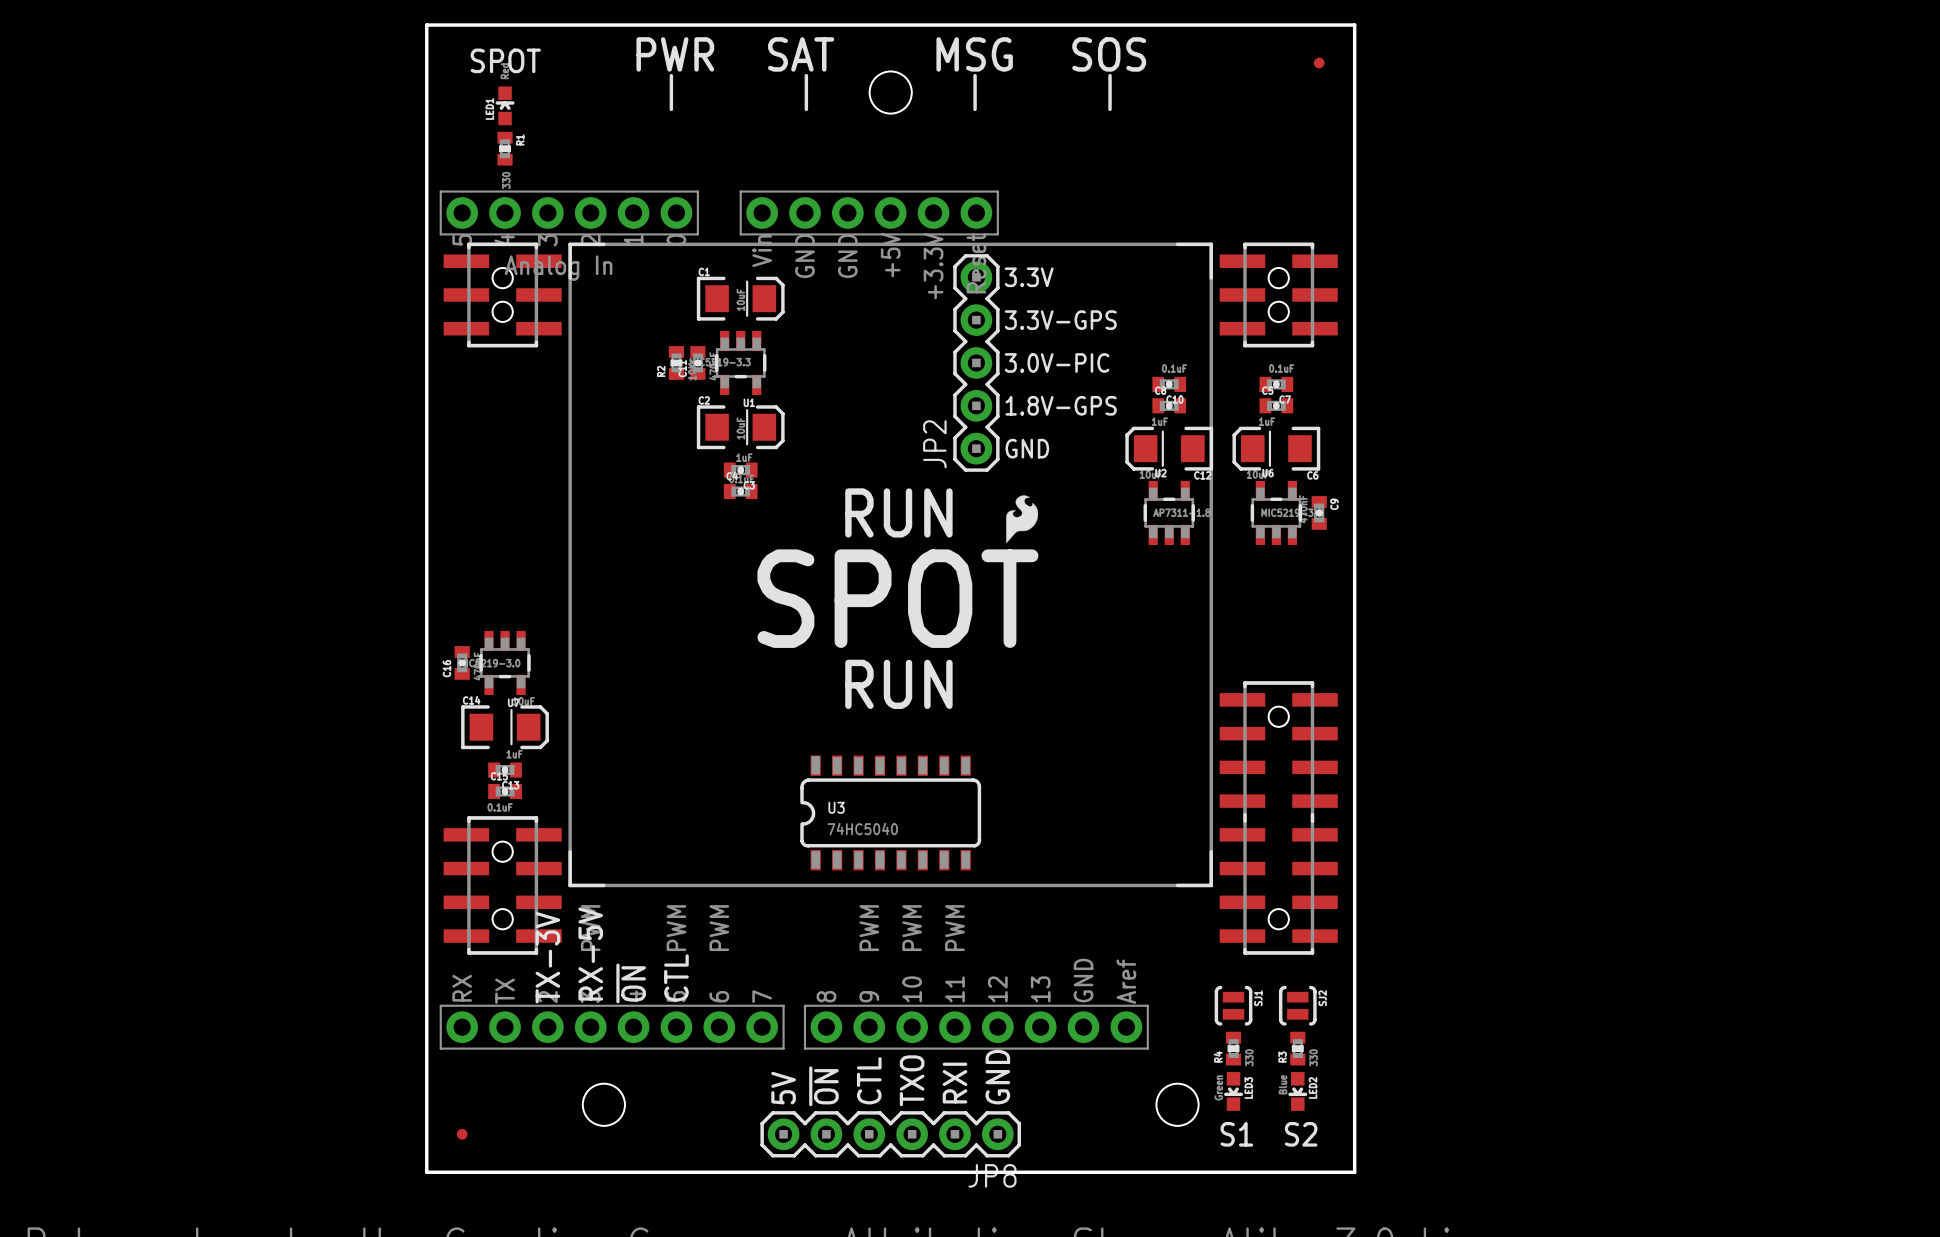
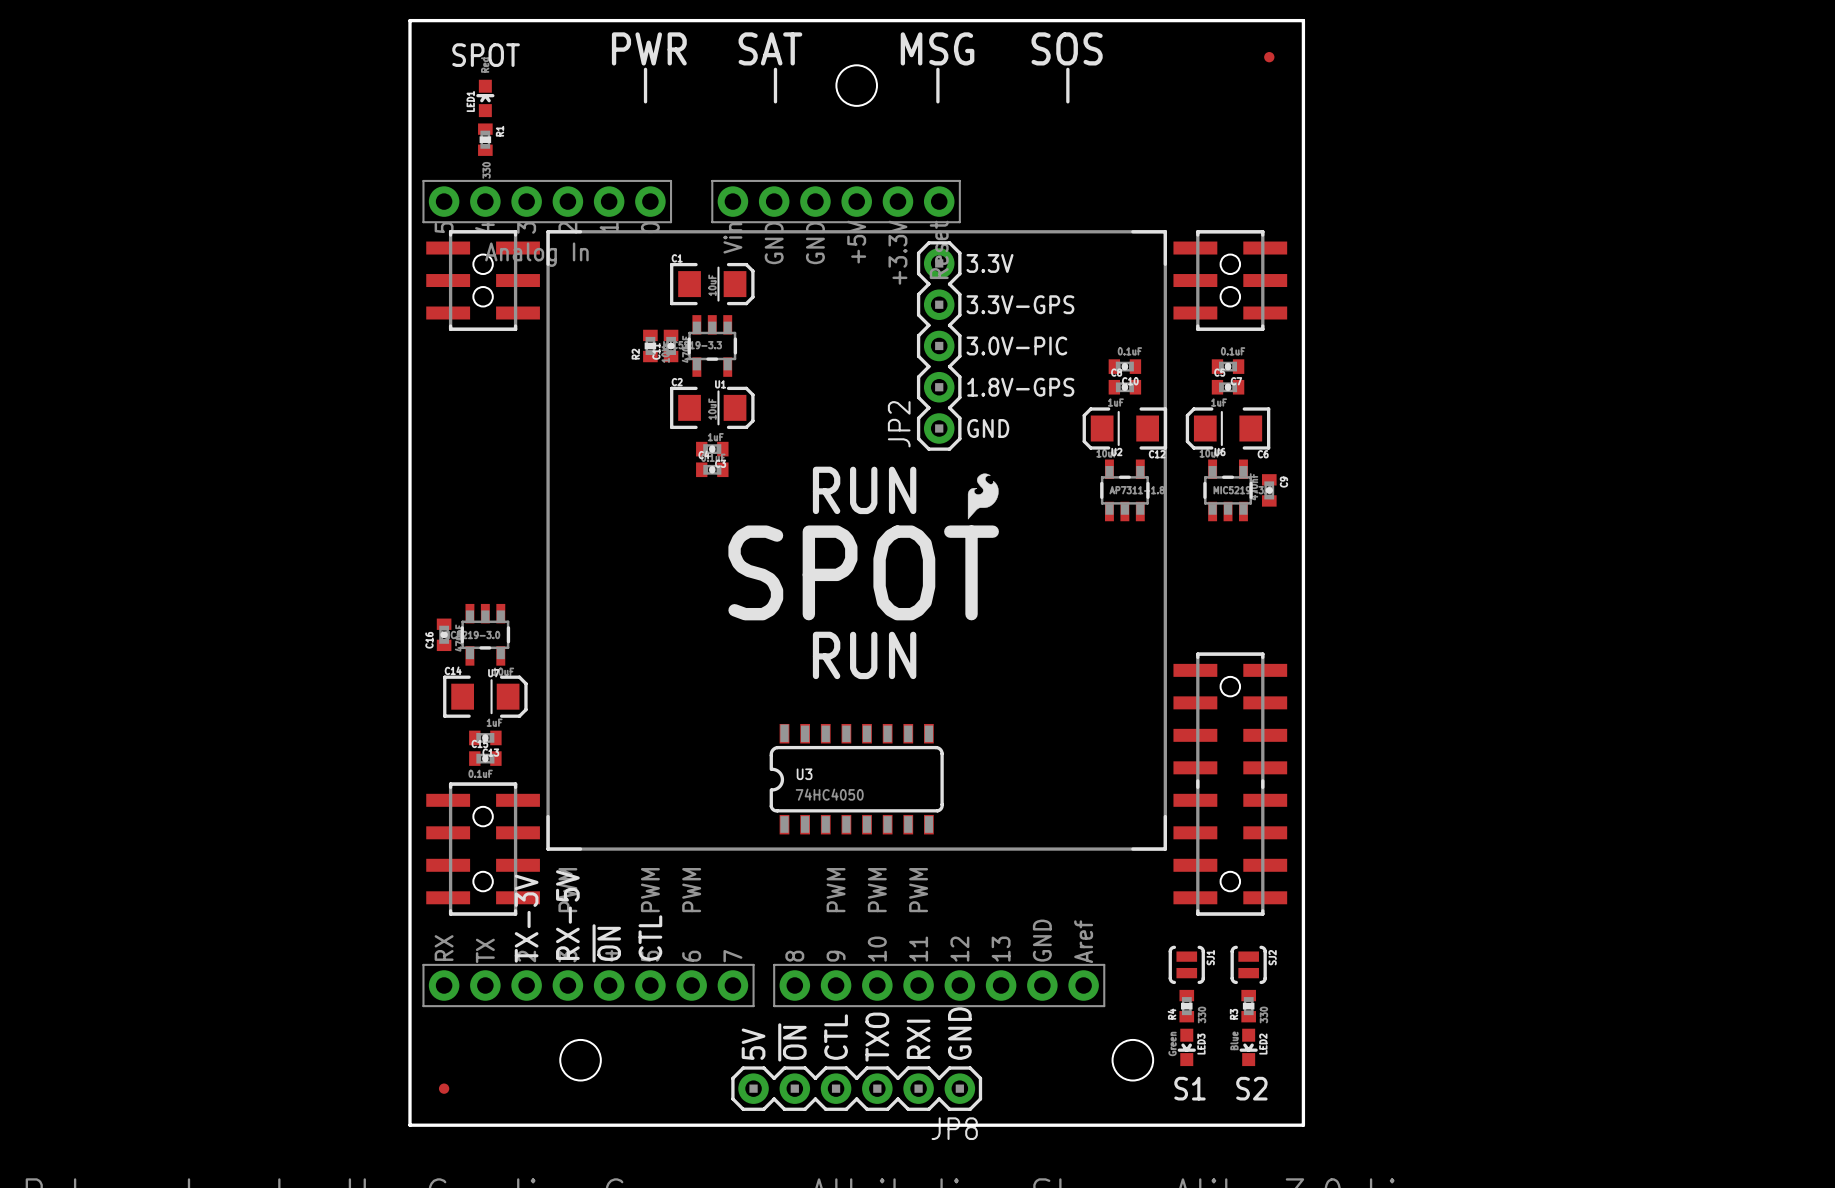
U3 value: 74HC5040 (862, 828) -> 74HC4050 (829, 794)

